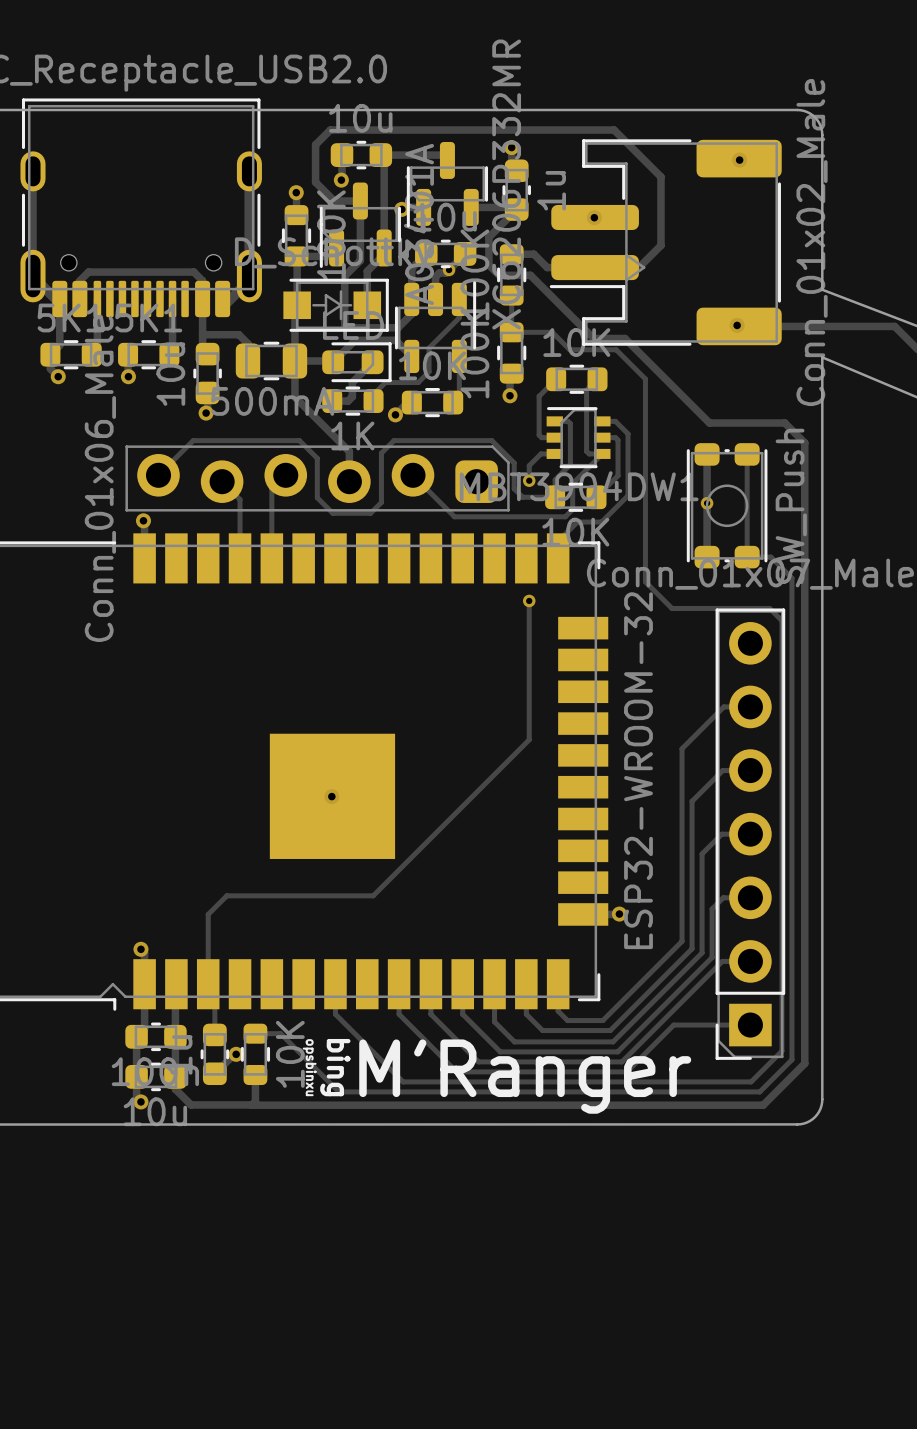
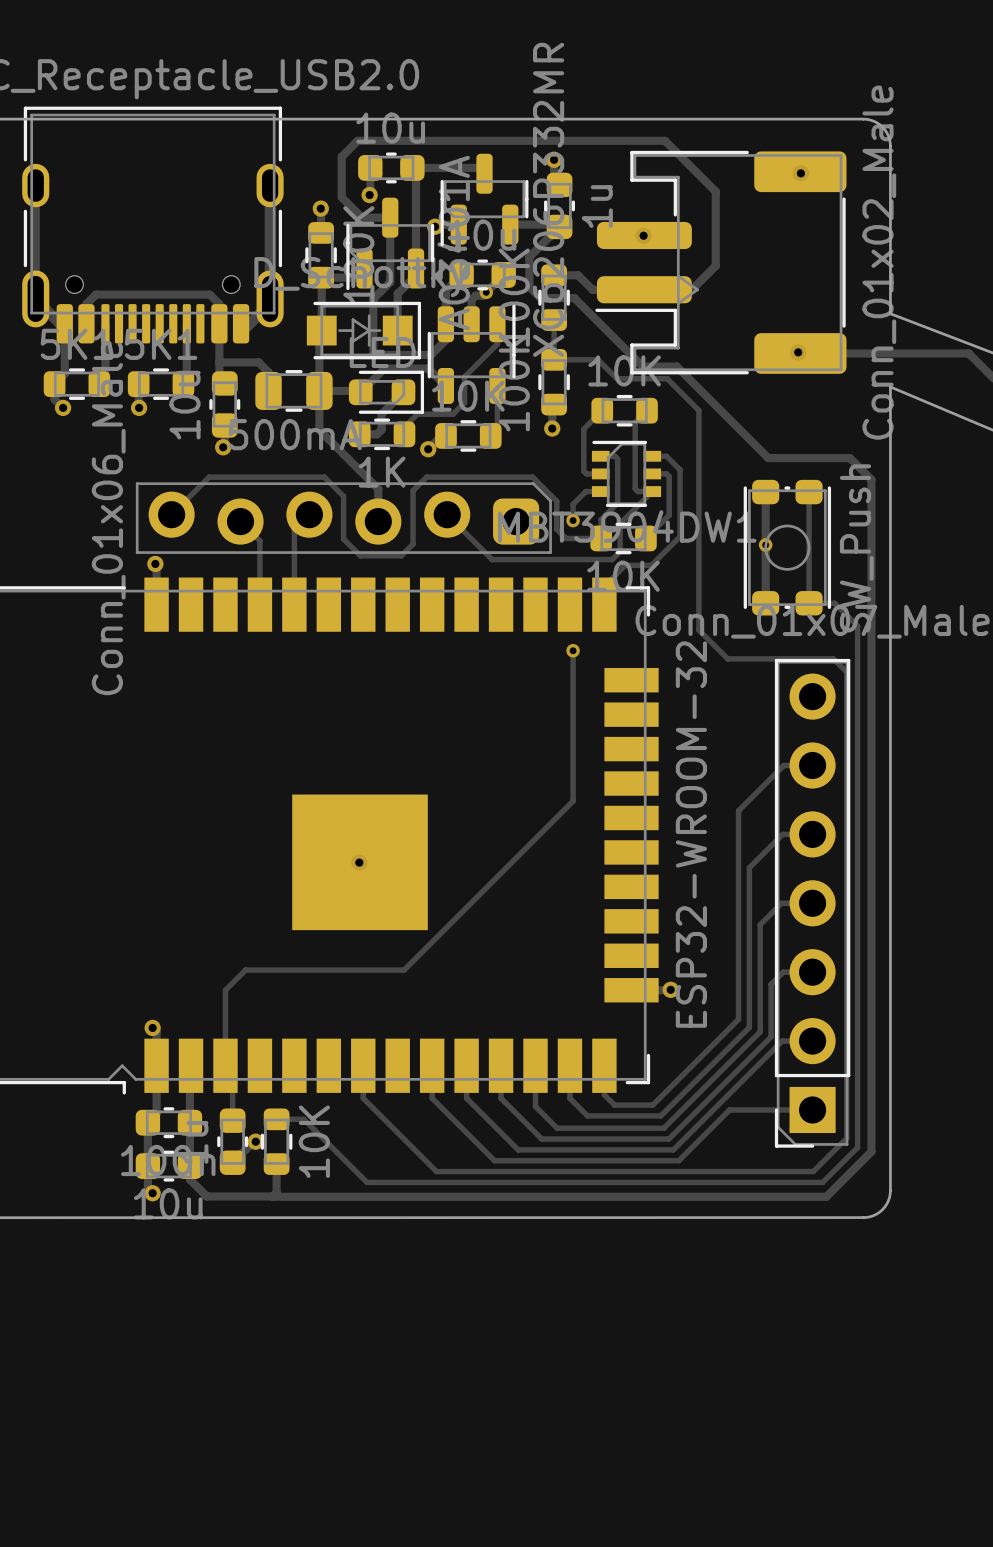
text: opsbinxu (309, 1067) -> none
text: bing (335, 1067) -> none
text: M'Ranger (525, 1076) -> none

